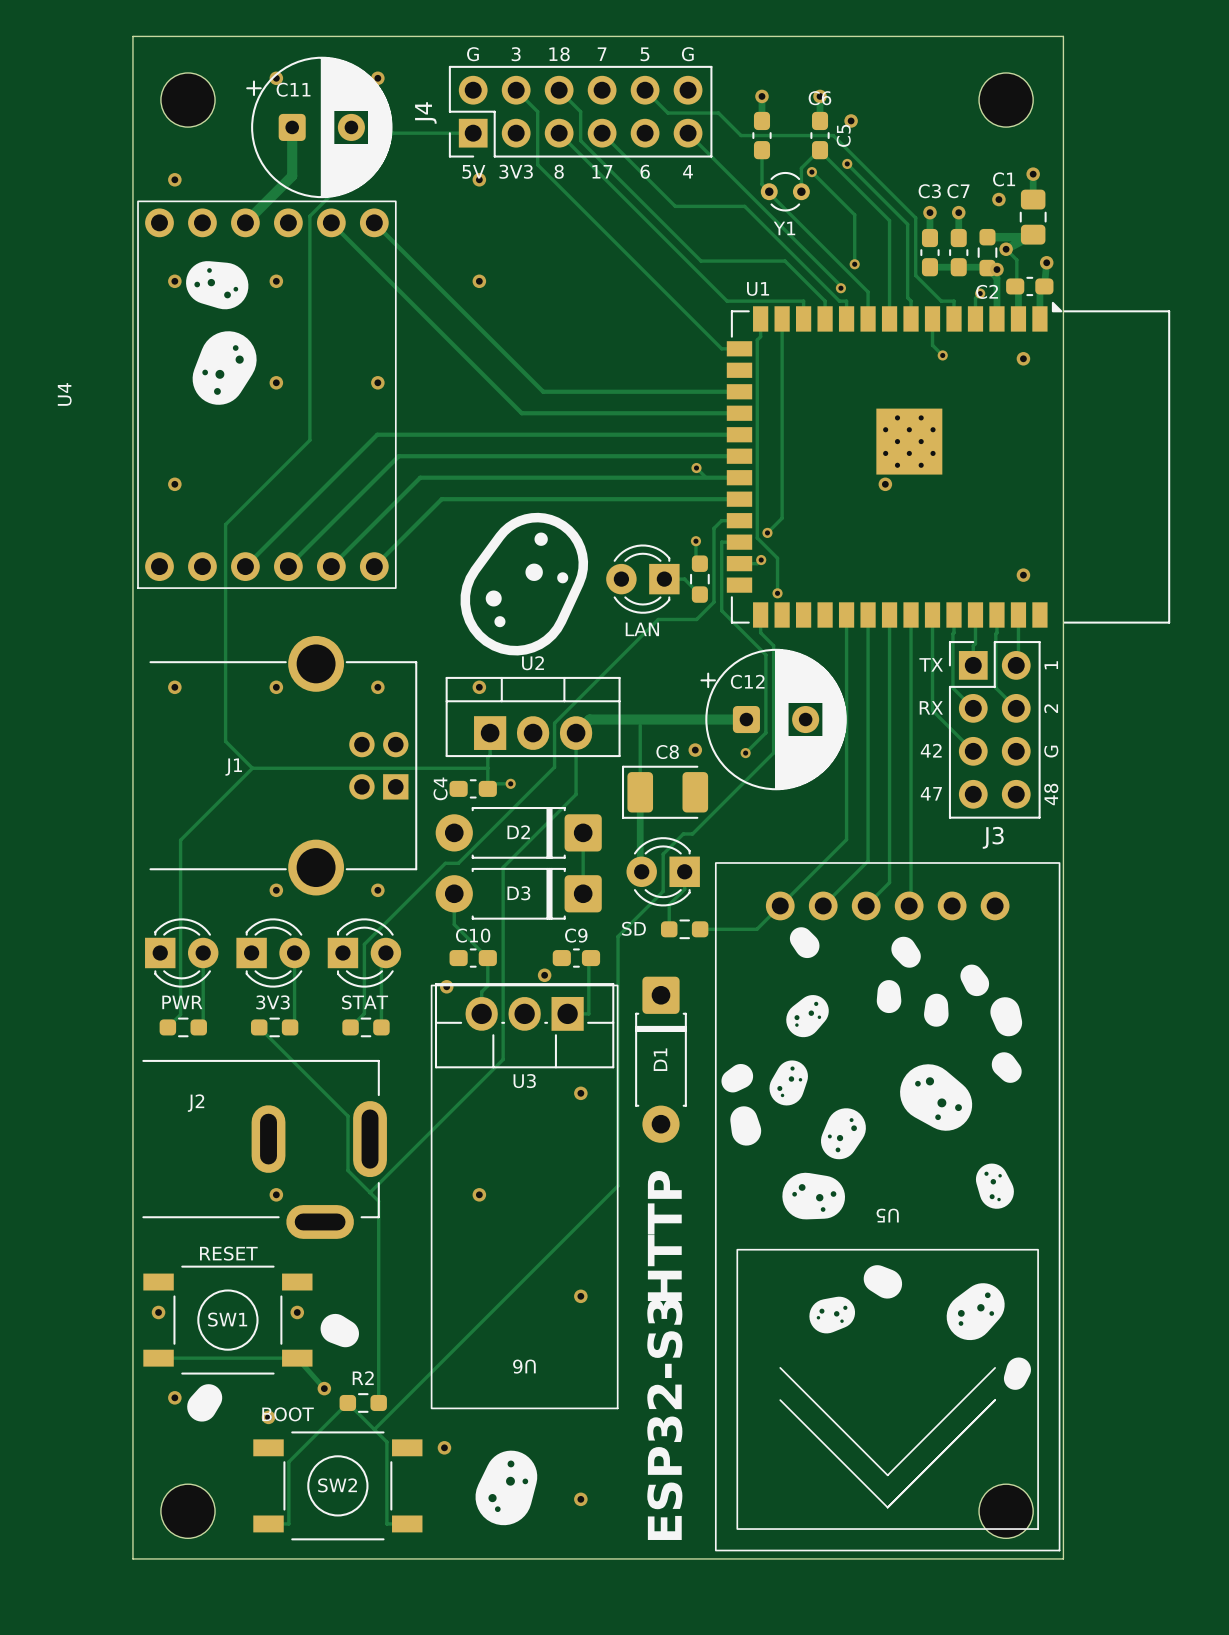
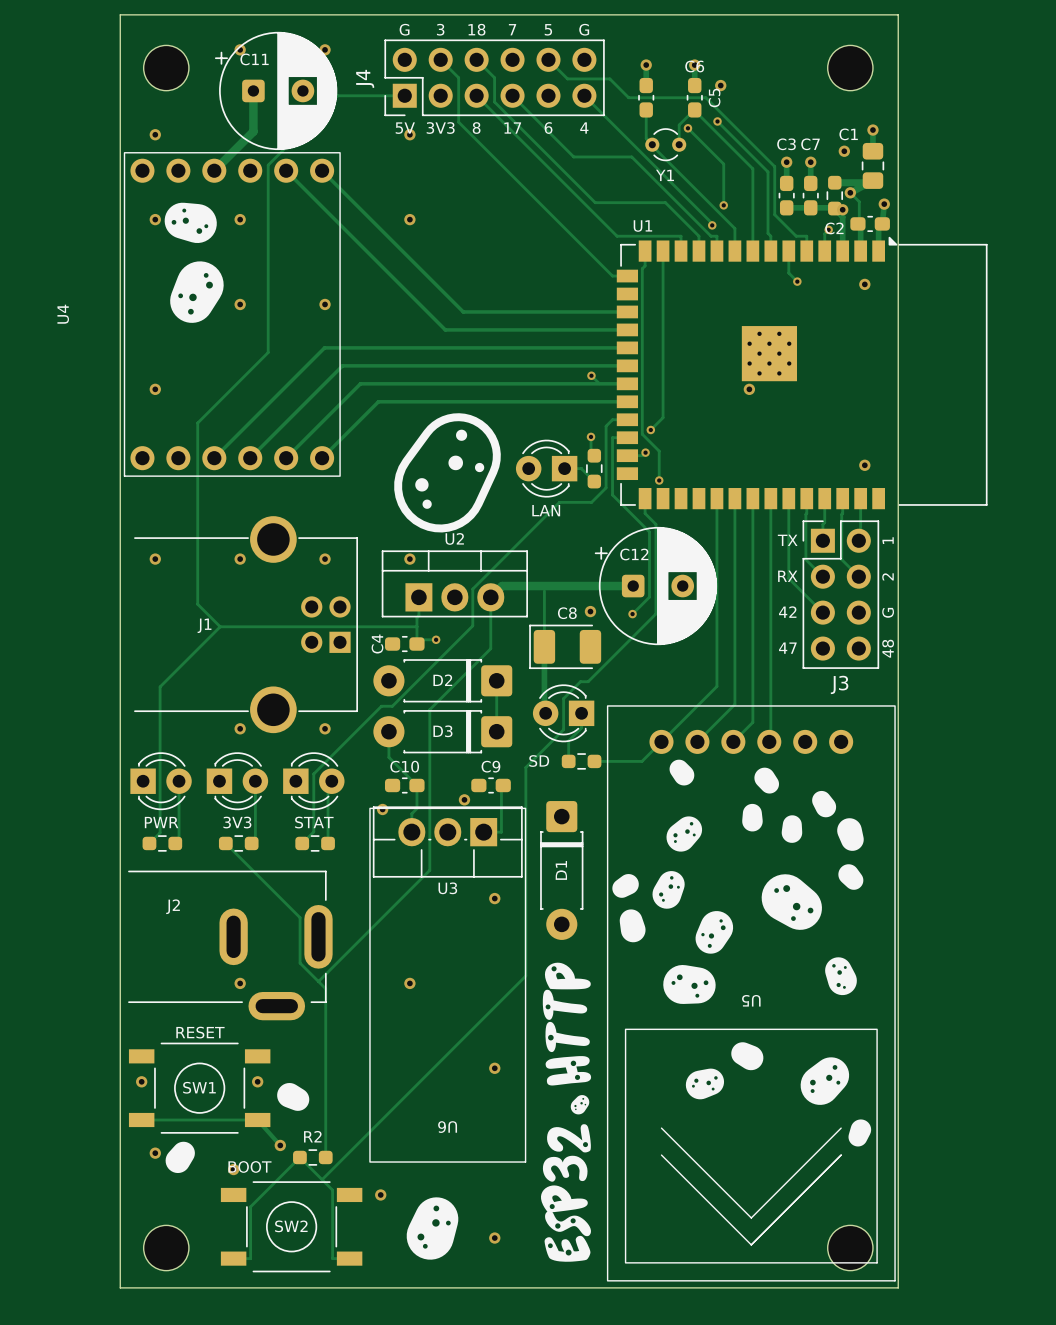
drawing: none -> [540, 962, 592, 1262]
text: HTTP (664, 1236) -> none
text: ESP32-S3 (664, 1419) -> none

